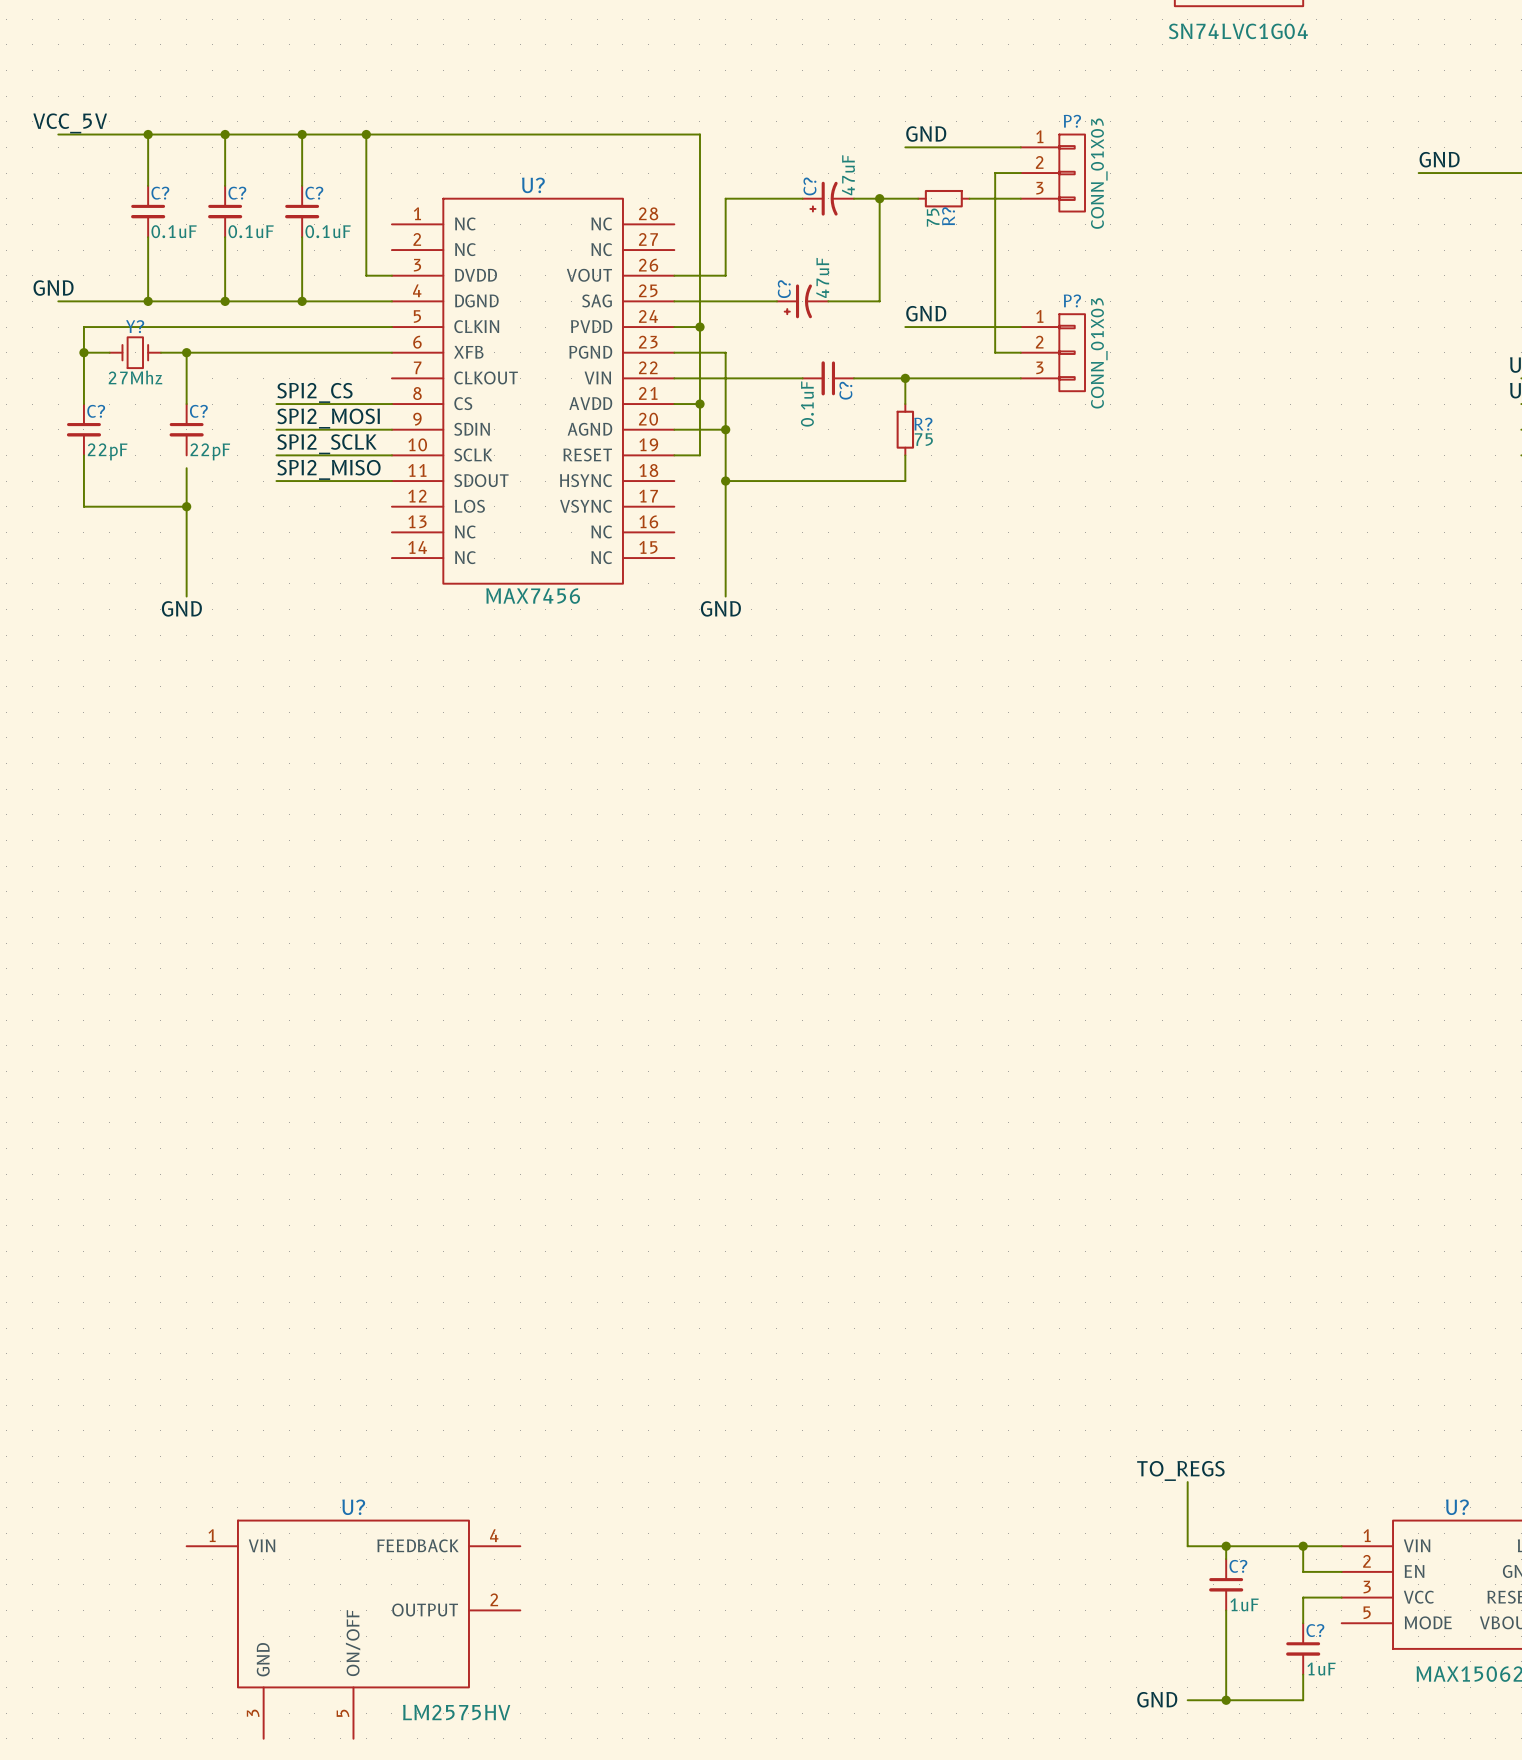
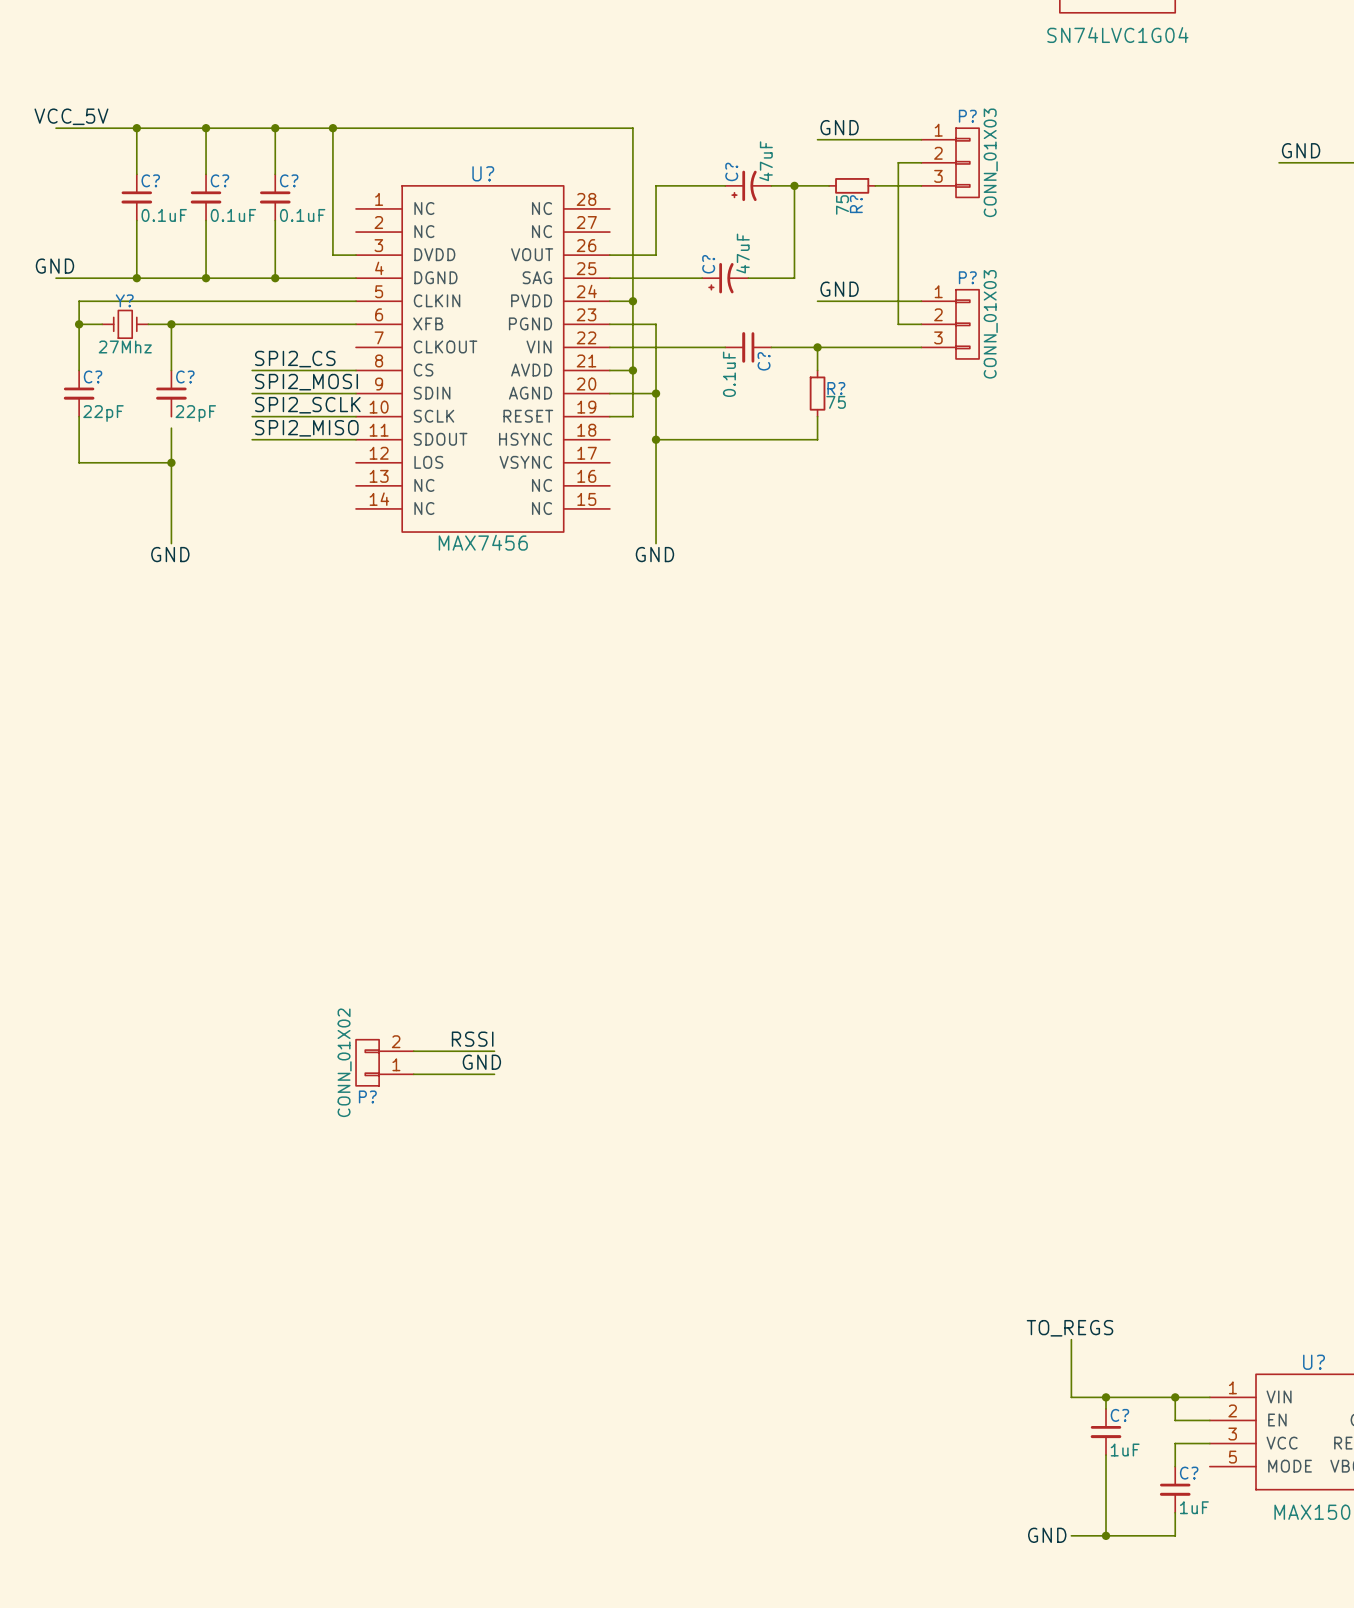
label: none -> RSSI (472, 1039)
wire: none -> (413, 1051) (494, 1051)
label: none -> GND (481, 1062)
P?: none -> CONN_01X02 (384, 1062)
wire: none -> (413, 1074) (494, 1074)
U?: LM2575HV (353, 1629) -> none

